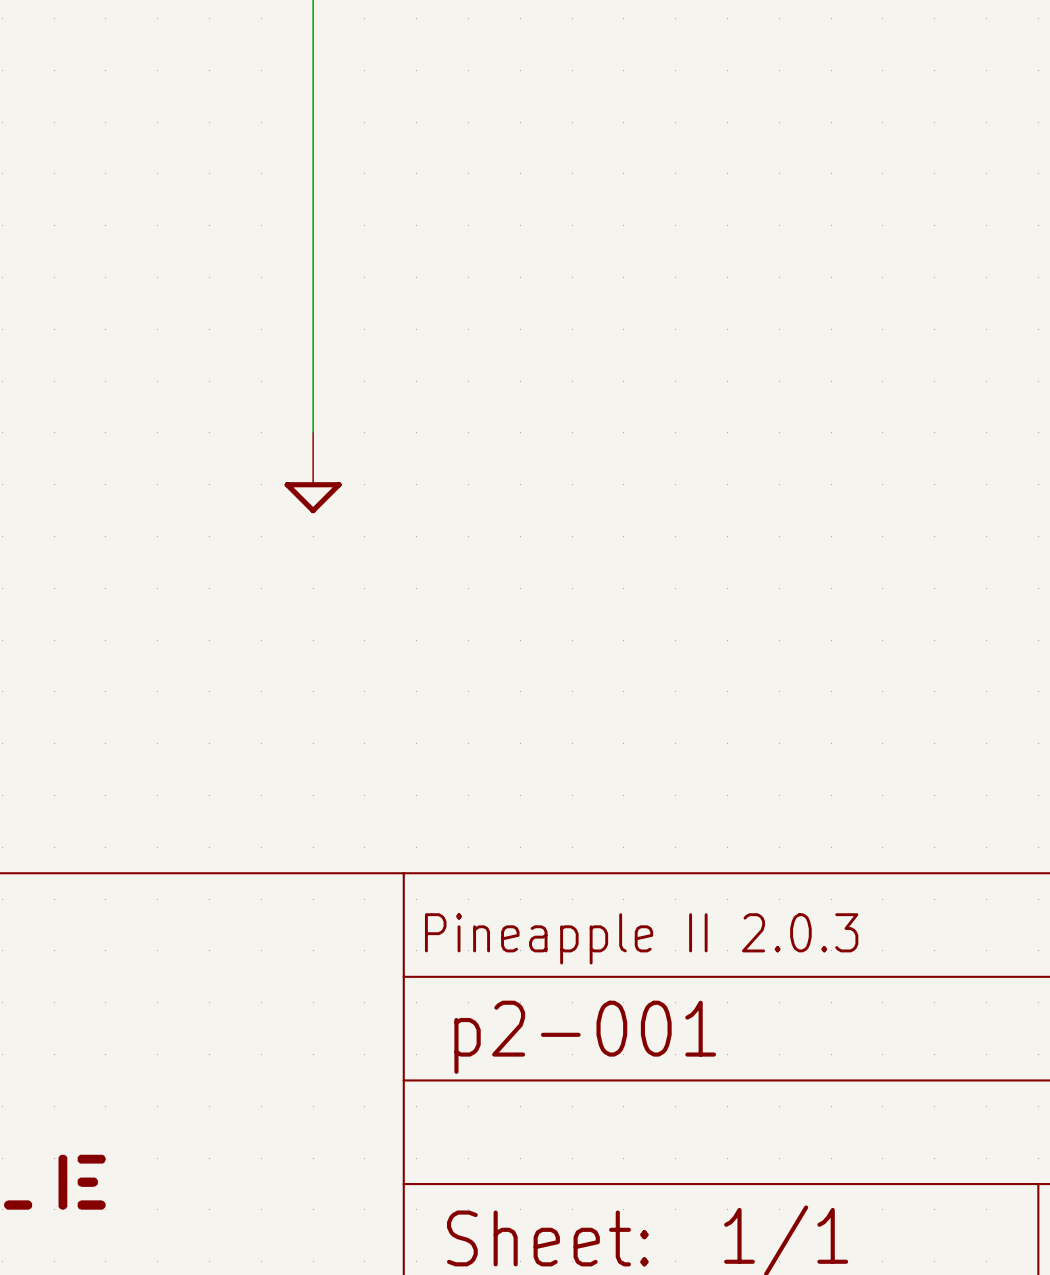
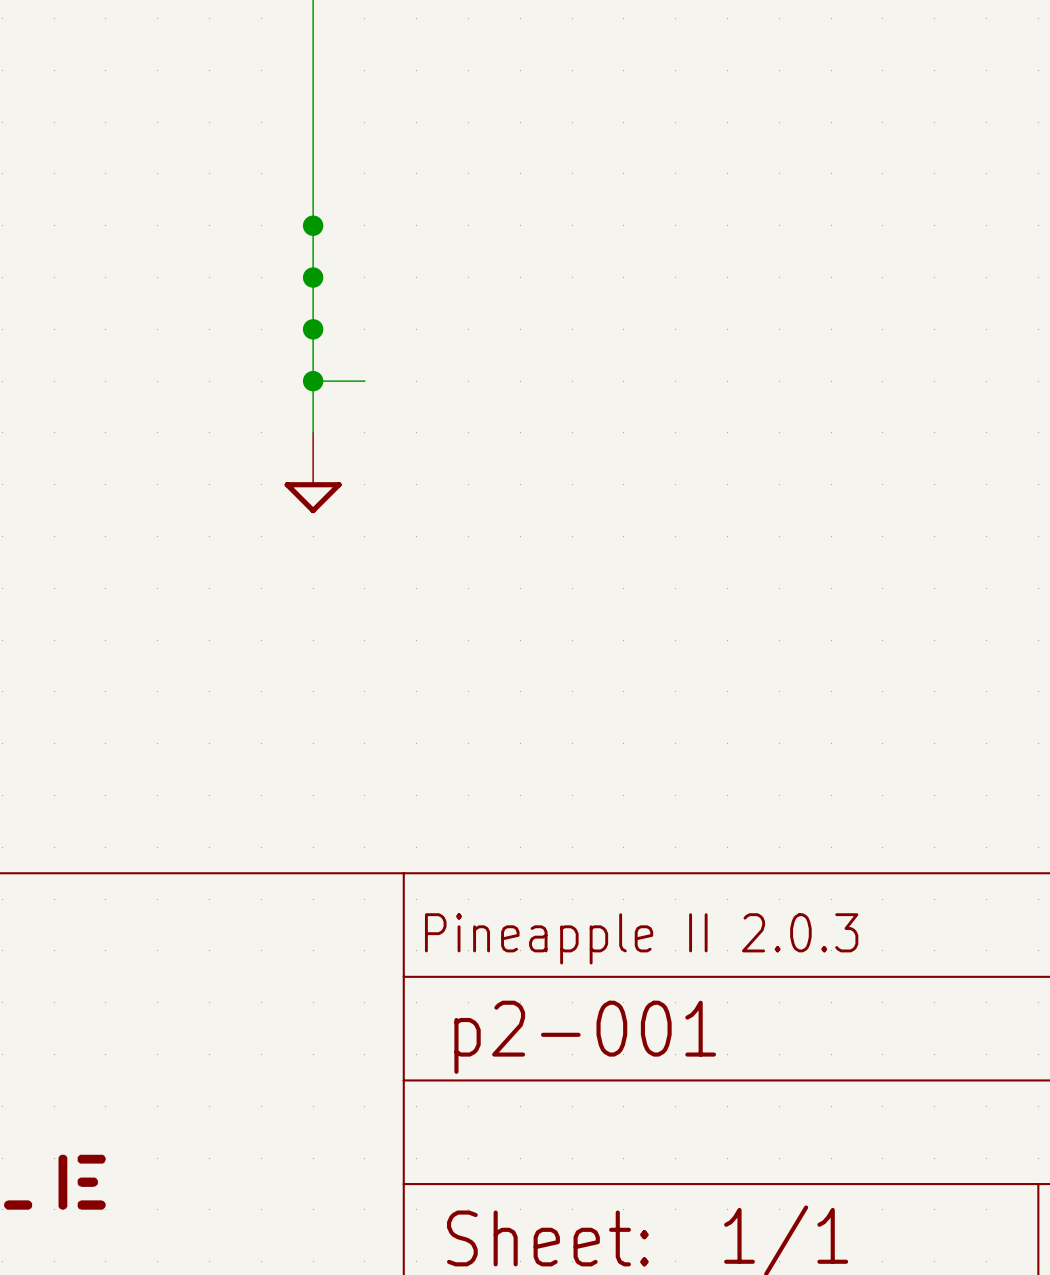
junction: none -> (313, 225)
junction: none -> (313, 277)
junction: none -> (313, 329)
wire: none -> (313, 381) (364, 381)
junction: none -> (313, 381)

